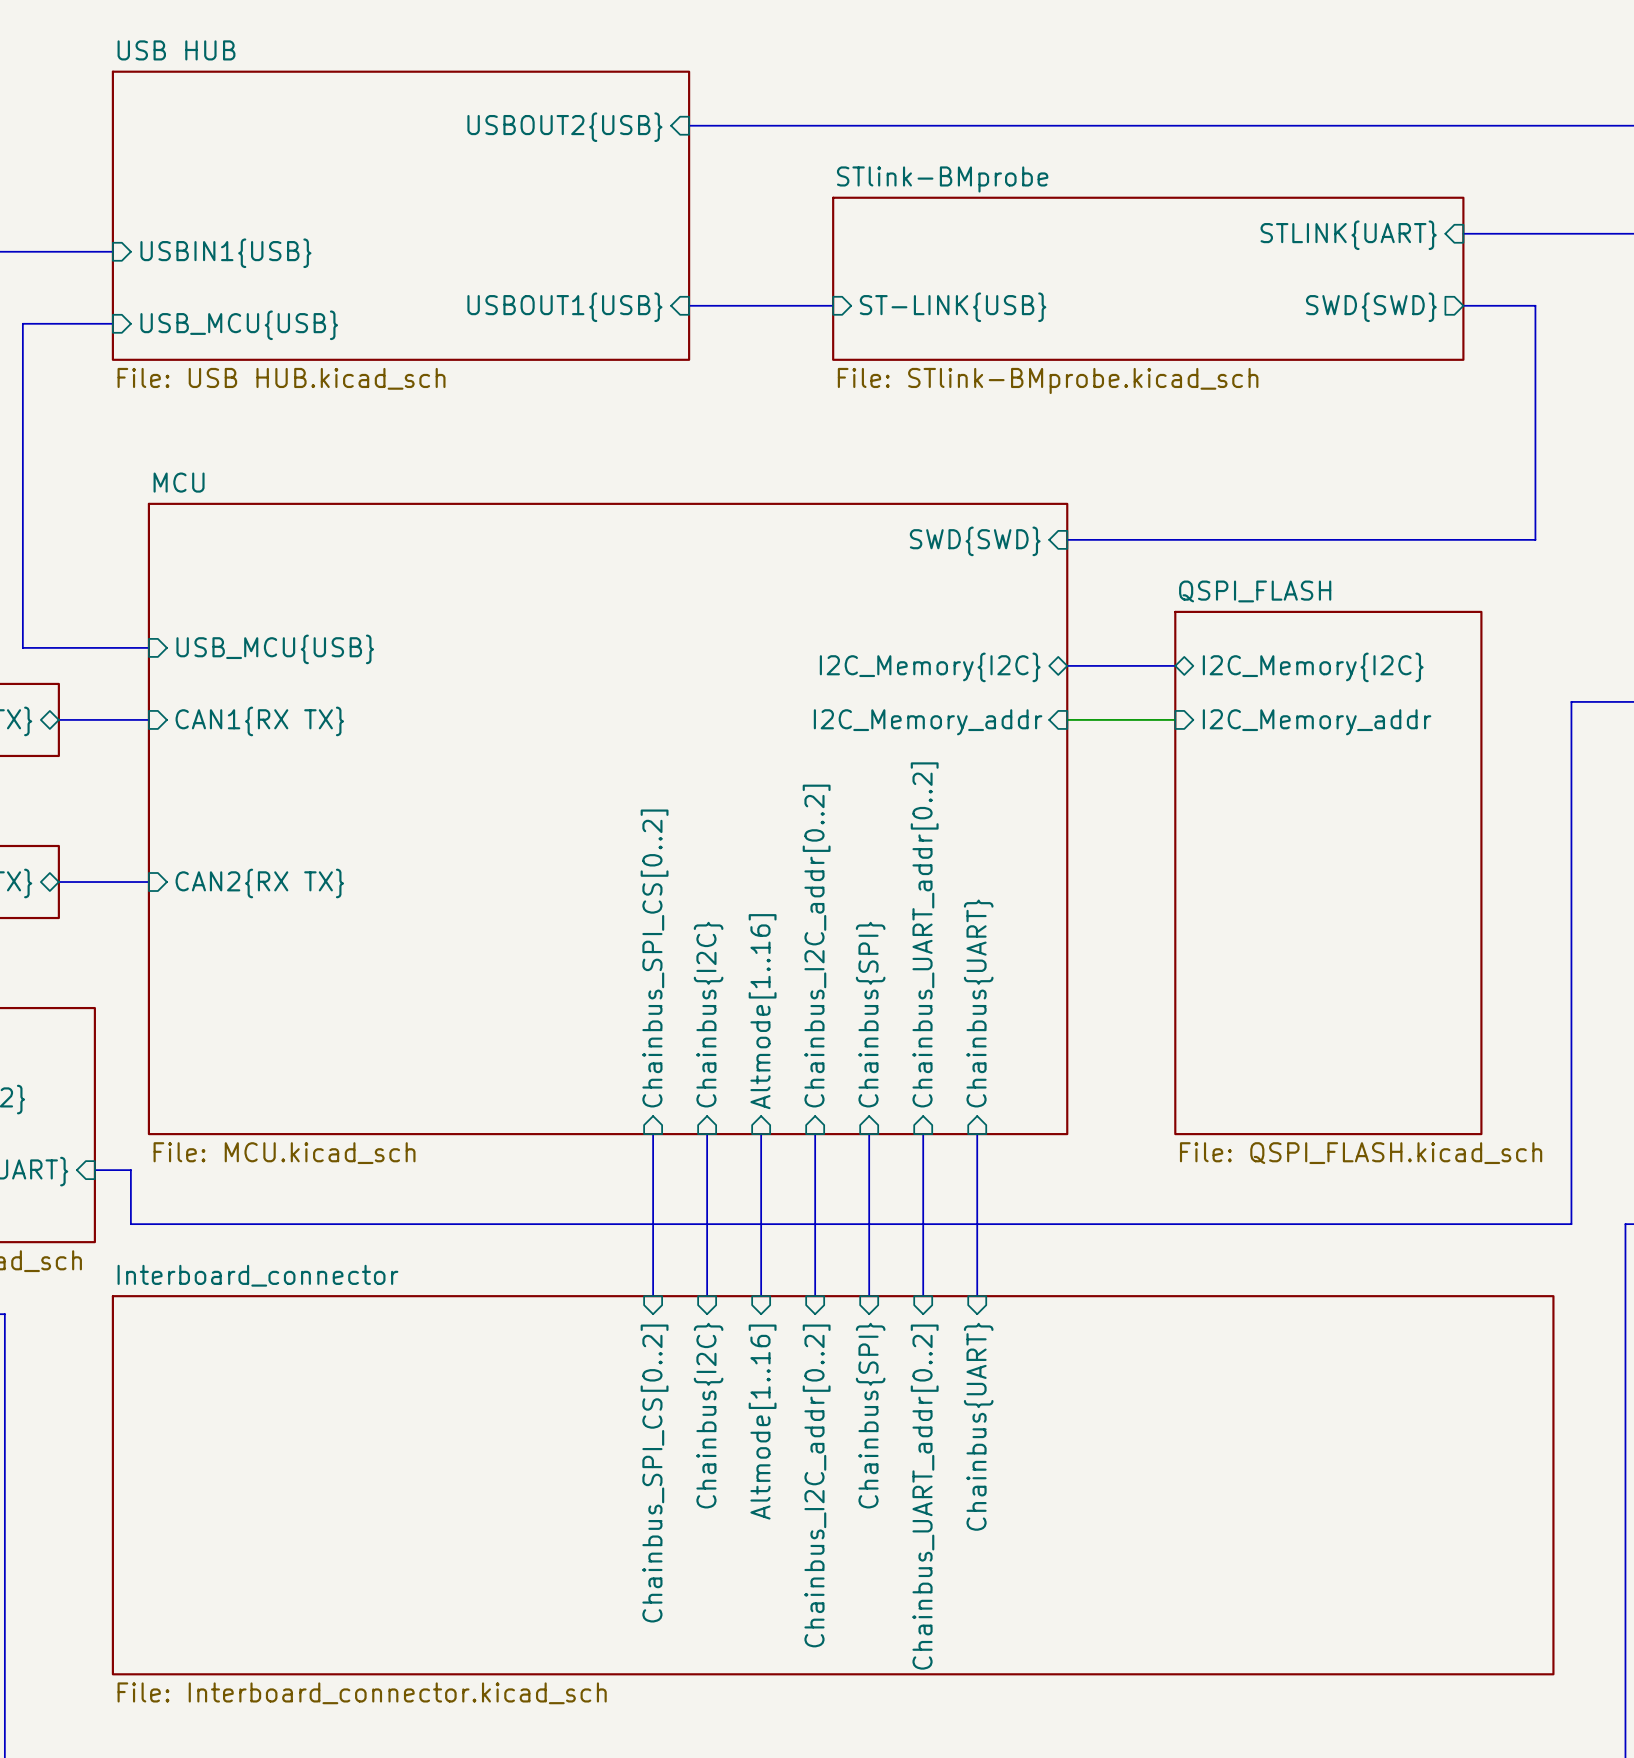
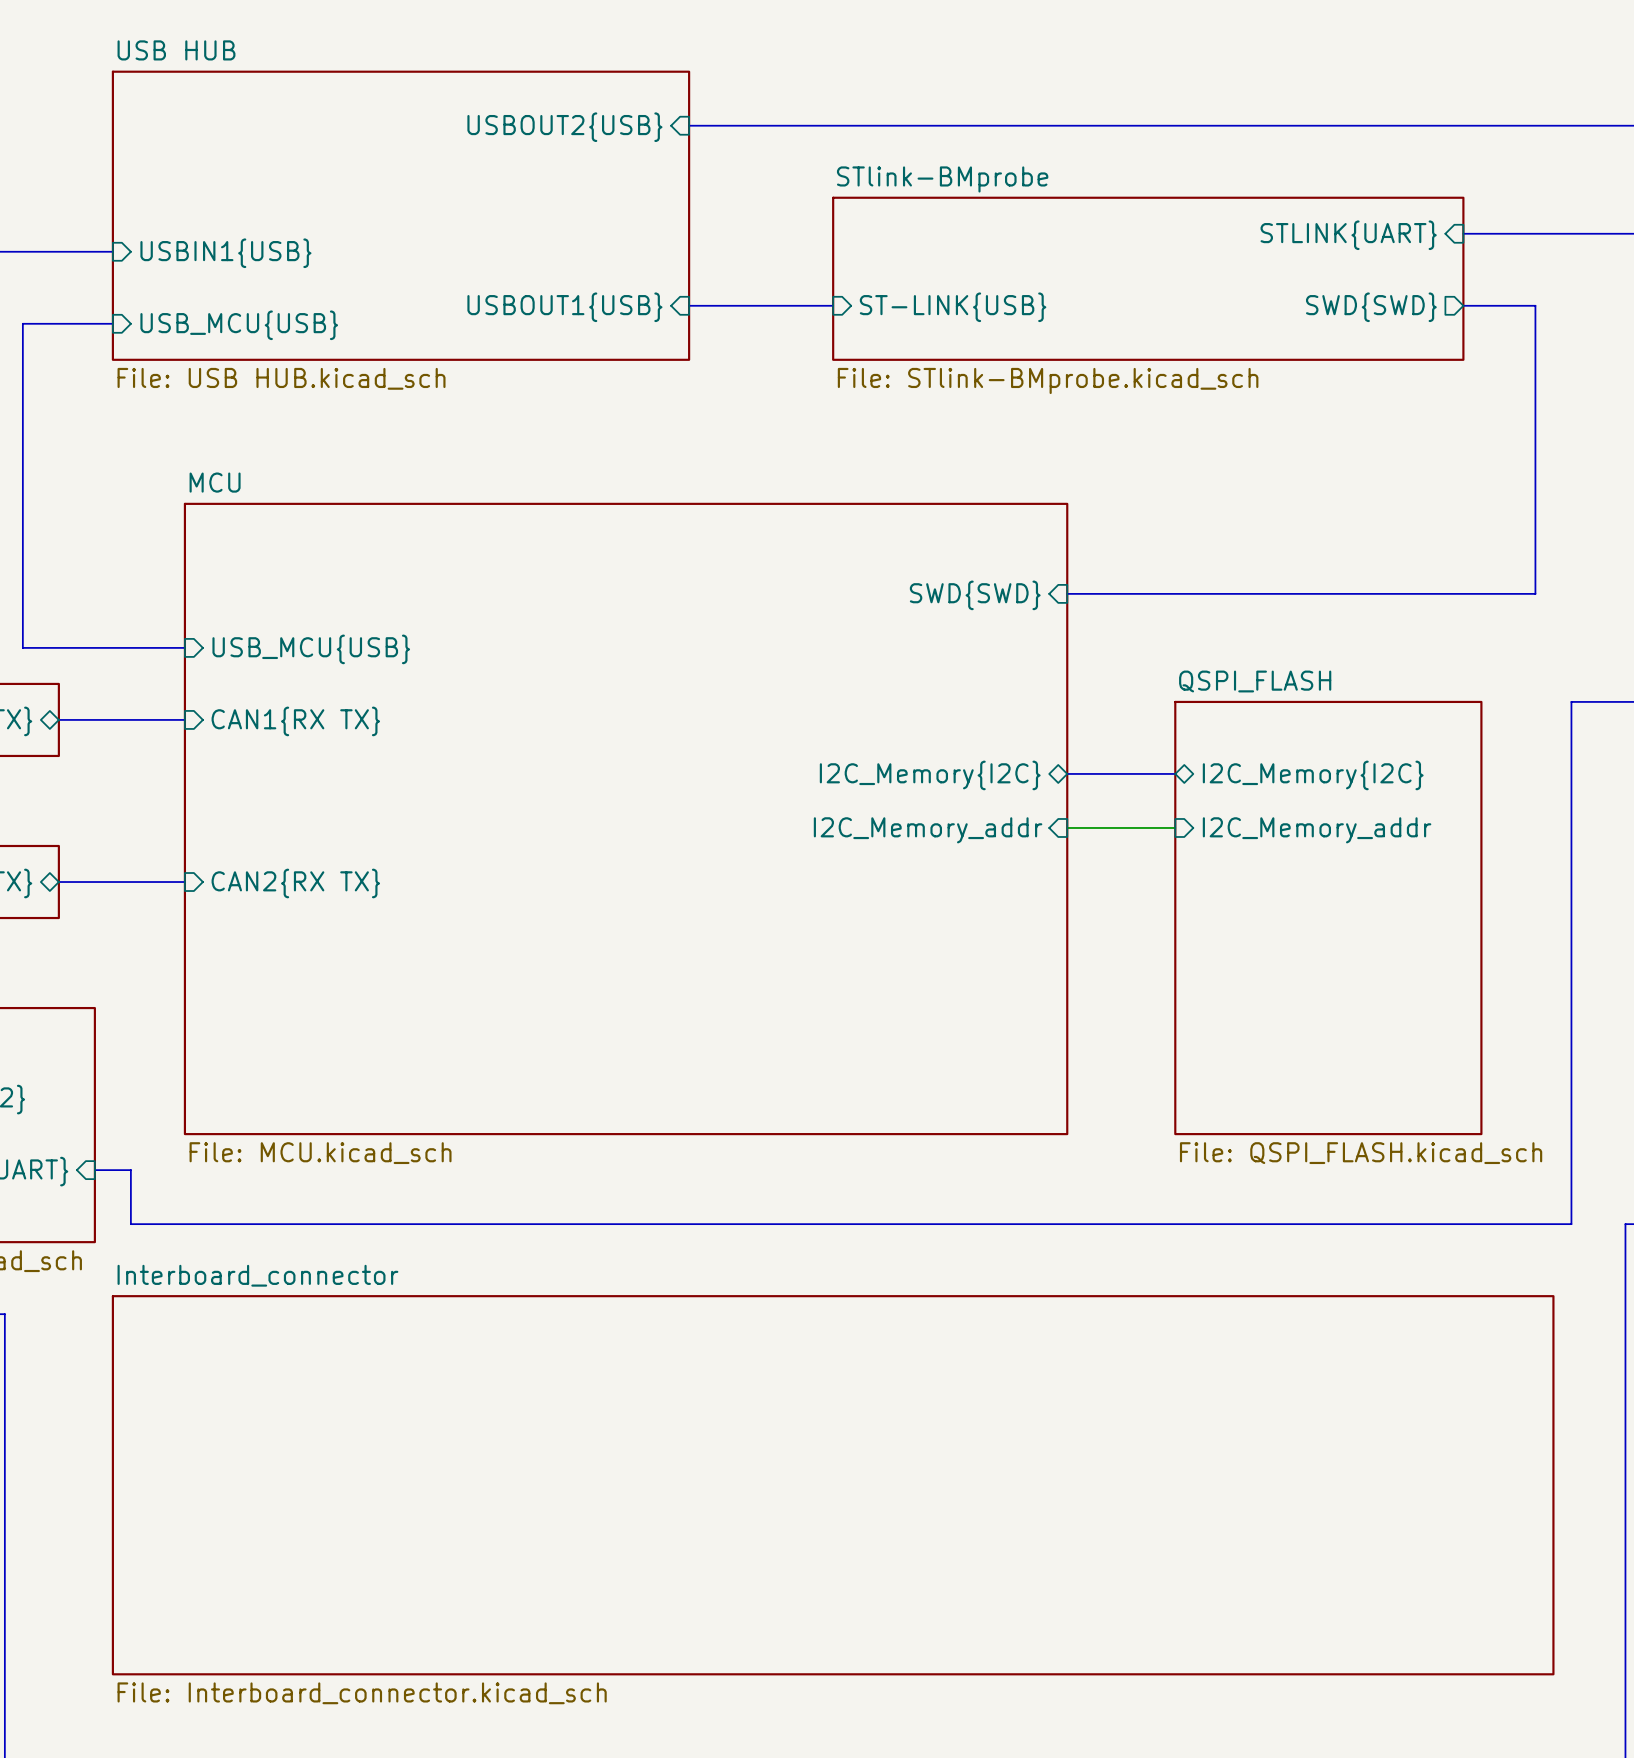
bus: (1067, 539) (1535, 539) -> (1067, 593) (1535, 593) (1535, 539)
sheet pin position: SWD{SWD} (975, 541) -> SWD{SWD} (975, 595)
bus: none -> (148, 647) (184, 647)
sheet pin position: USB_MCU{USB} (275, 649) -> USB_MCU{USB} (311, 649)
bus: (1067, 665) (1175, 665) -> (1067, 773) (1175, 773)
sheet pin: I2C_Memory{I2C} (930, 667) -> none
sheet pin: I2C_Memory{I2C} (1313, 667) -> none
bus: none -> (148, 719) (184, 719)
wire: (1067, 719) (1175, 719) -> (1067, 827) (1175, 827)
sheet pin position: CAN1{RX TX} (259, 721) -> CAN1{RX TX} (295, 721)
sheet pin: I2C_Memory_addr (928, 722) -> none
sheet pin: I2C_Memory_addr (1317, 722) -> none
sheet pin: none -> I2C_Memory{I2C} (930, 775)
sheet pin: none -> I2C_Memory{I2C} (1313, 775)
sheet MCU: File: MCU.kicad_sch (608, 818) -> none
sheet MCU: none -> File: MCU.kicad_sch (626, 818)
sheet pin: none -> I2C_Memory_addr (928, 830)
sheet pin: none -> I2C_Memory_addr (1317, 830)
sheet QSPI_FLASH: File: QSPI_FLASH.kicad_sch (1328, 873) -> none
bus: none -> (148, 882) (184, 882)
sheet pin position: CAN2{RX TX} (259, 883) -> CAN2{RX TX} (295, 883)
sheet QSPI_FLASH: none -> File: QSPI_FLASH.kicad_sch (1328, 918)
sheet pin: Chainbus_UART_addr[0..2] (924, 934) -> none
sheet pin: Chainbus_I2C_addr[0..2] (816, 946) -> none
sheet pin: Chainbus_SPI_CS[0..2] (654, 958) -> none
sheet pin: Chainbus{UART} (978, 1003) -> none
sheet pin: Altmode[1..16] (762, 1011) -> none
sheet pin: Chainbus{I2C} (708, 1014) -> none
sheet pin: Chainbus{SPI} (870, 1014) -> none
bus: (653, 1134) (653, 1296) -> none
bus: (707, 1134) (707, 1296) -> none
bus: (761, 1134) (761, 1296) -> none
bus: (815, 1134) (815, 1296) -> none
bus: (869, 1134) (869, 1296) -> none
bus: (923, 1134) (923, 1296) -> none
bus: (977, 1134) (977, 1296) -> none
sheet pin: Chainbus{I2C} (708, 1415) -> none
sheet pin: Chainbus{SPI} (870, 1415) -> none
sheet pin: Altmode[1..16] (762, 1422) -> none
sheet pin: Chainbus{UART} (978, 1426) -> none
sheet pin: Chainbus_SPI_CS[0..2] (654, 1473) -> none
sheet pin: Chainbus_I2C_addr[0..2] (816, 1485) -> none
sheet pin: Chainbus_UART_addr[0..2] (924, 1497) -> none

